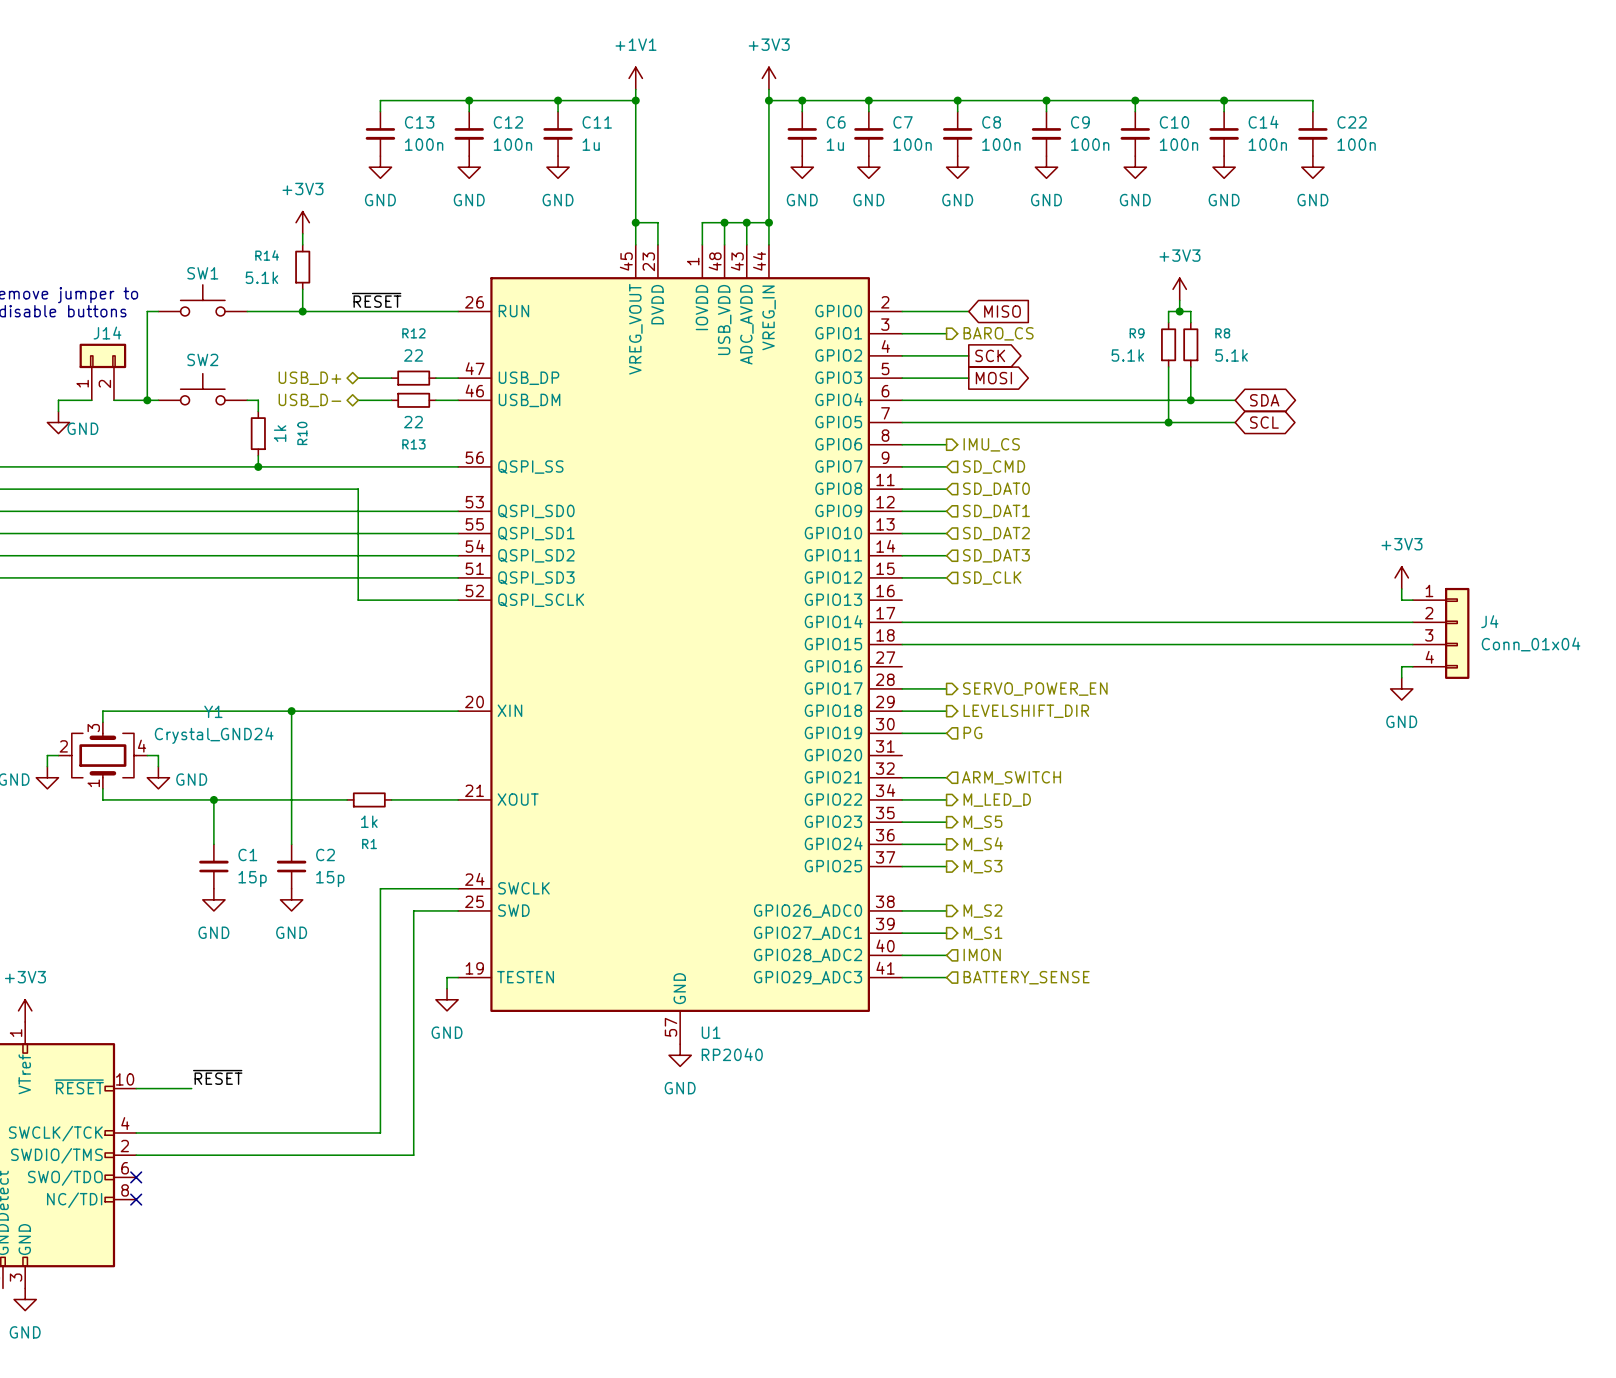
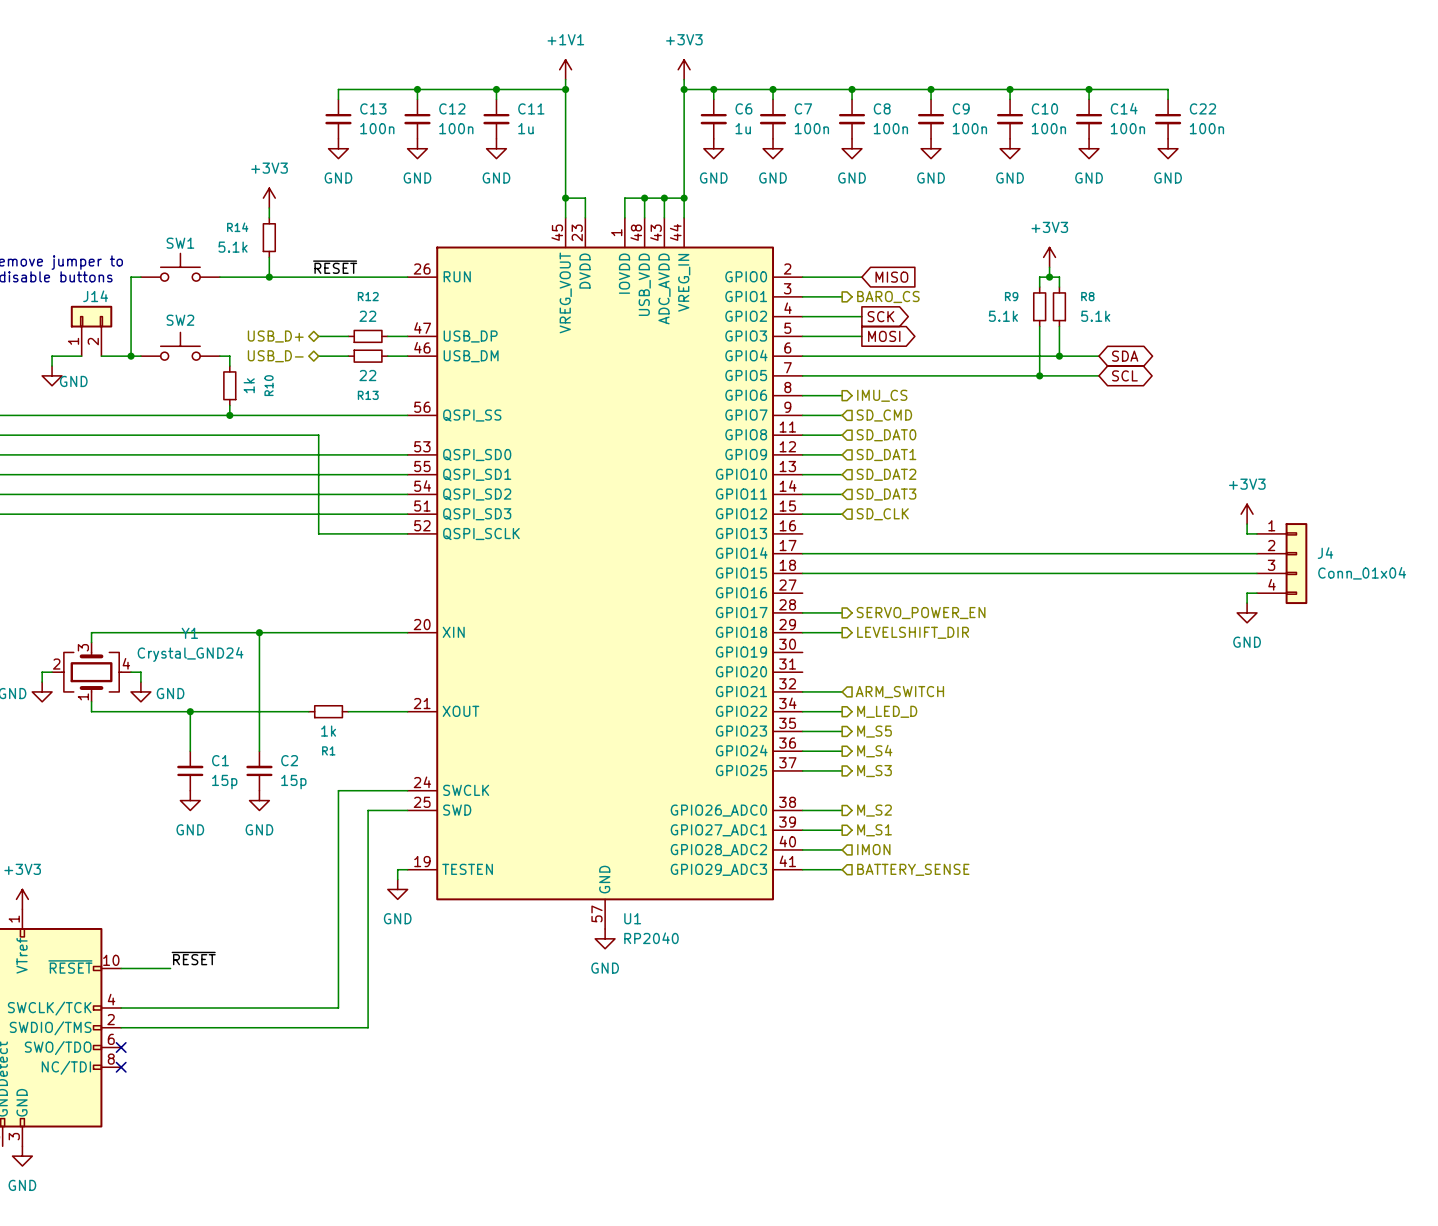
hierarchical label: PG (972, 732) -> none
wire: (902, 733) (946, 733) -> none

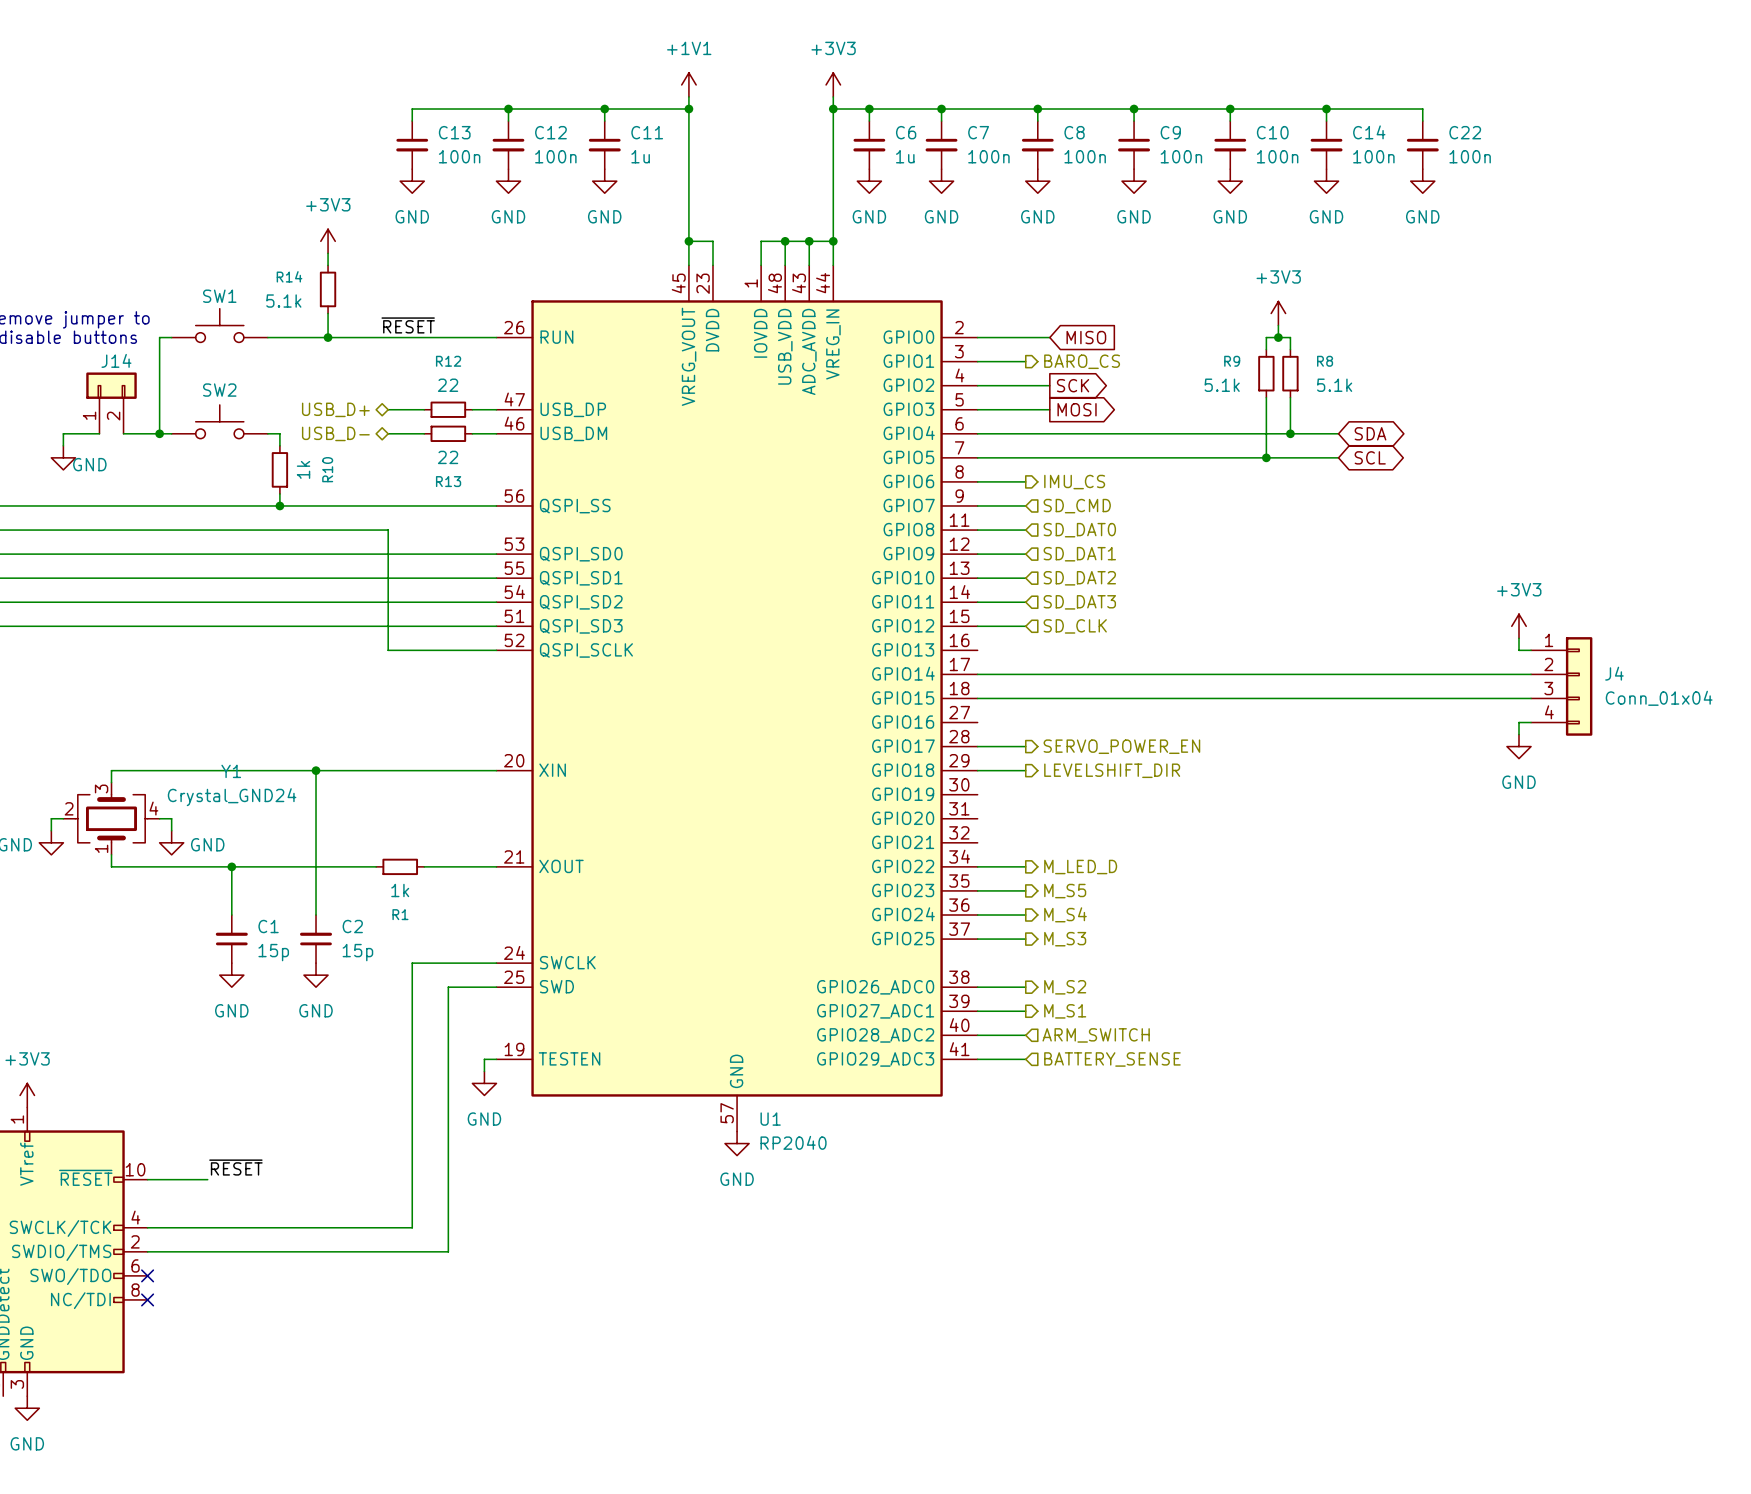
wire: (802, 691) (842, 691) -> none
hierarchical label: ARM_SWITCH (899, 692) -> none
hierarchical label: IMON (873, 849) -> ARM_SWITCH (1096, 1035)

